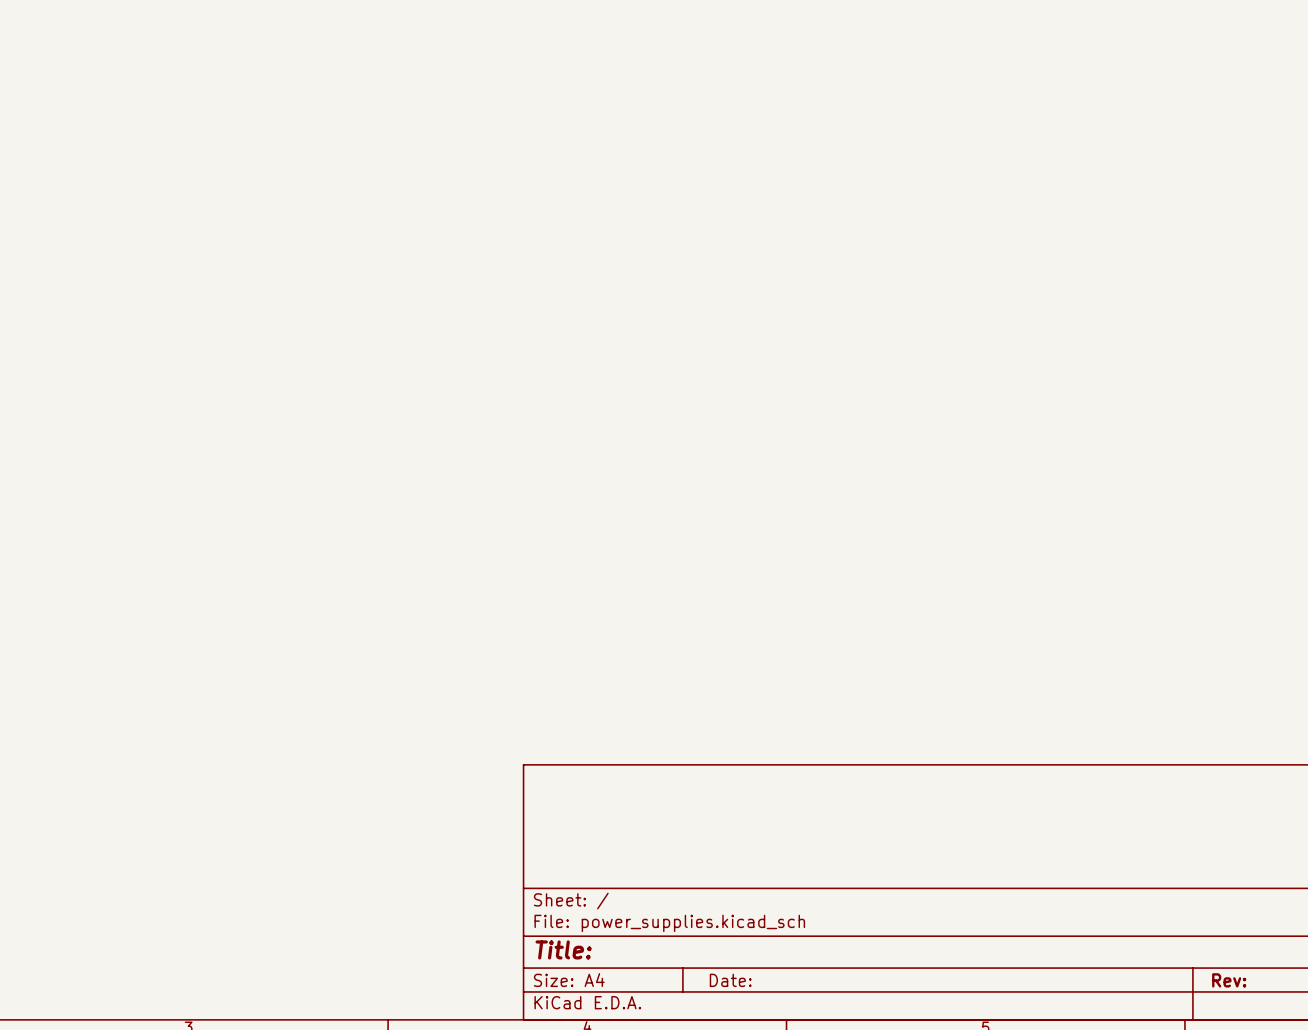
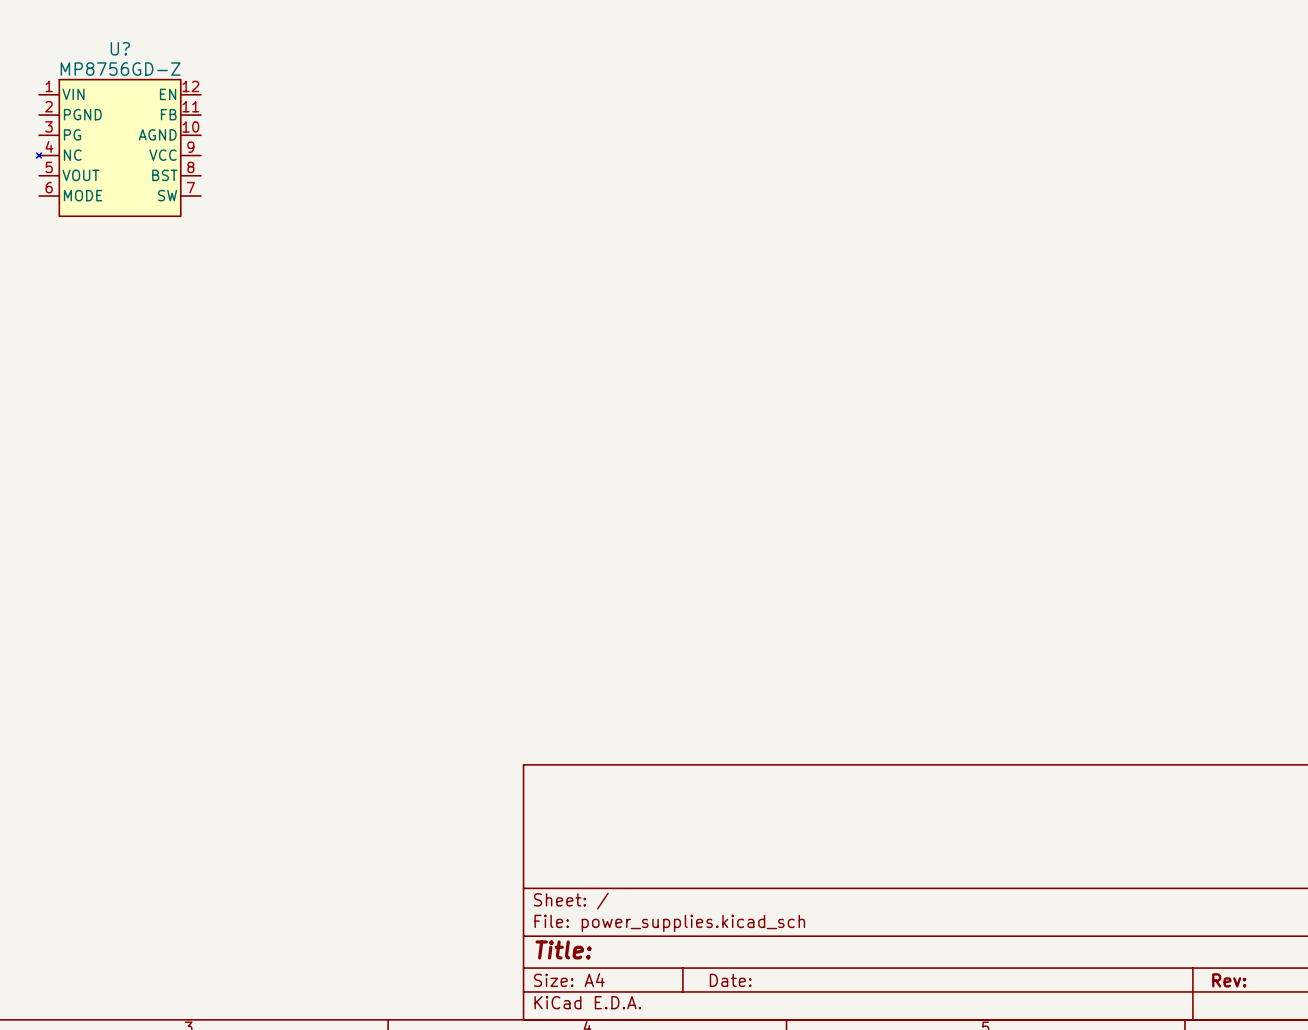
U?: none -> MP8756GD-Z (118, 147)

